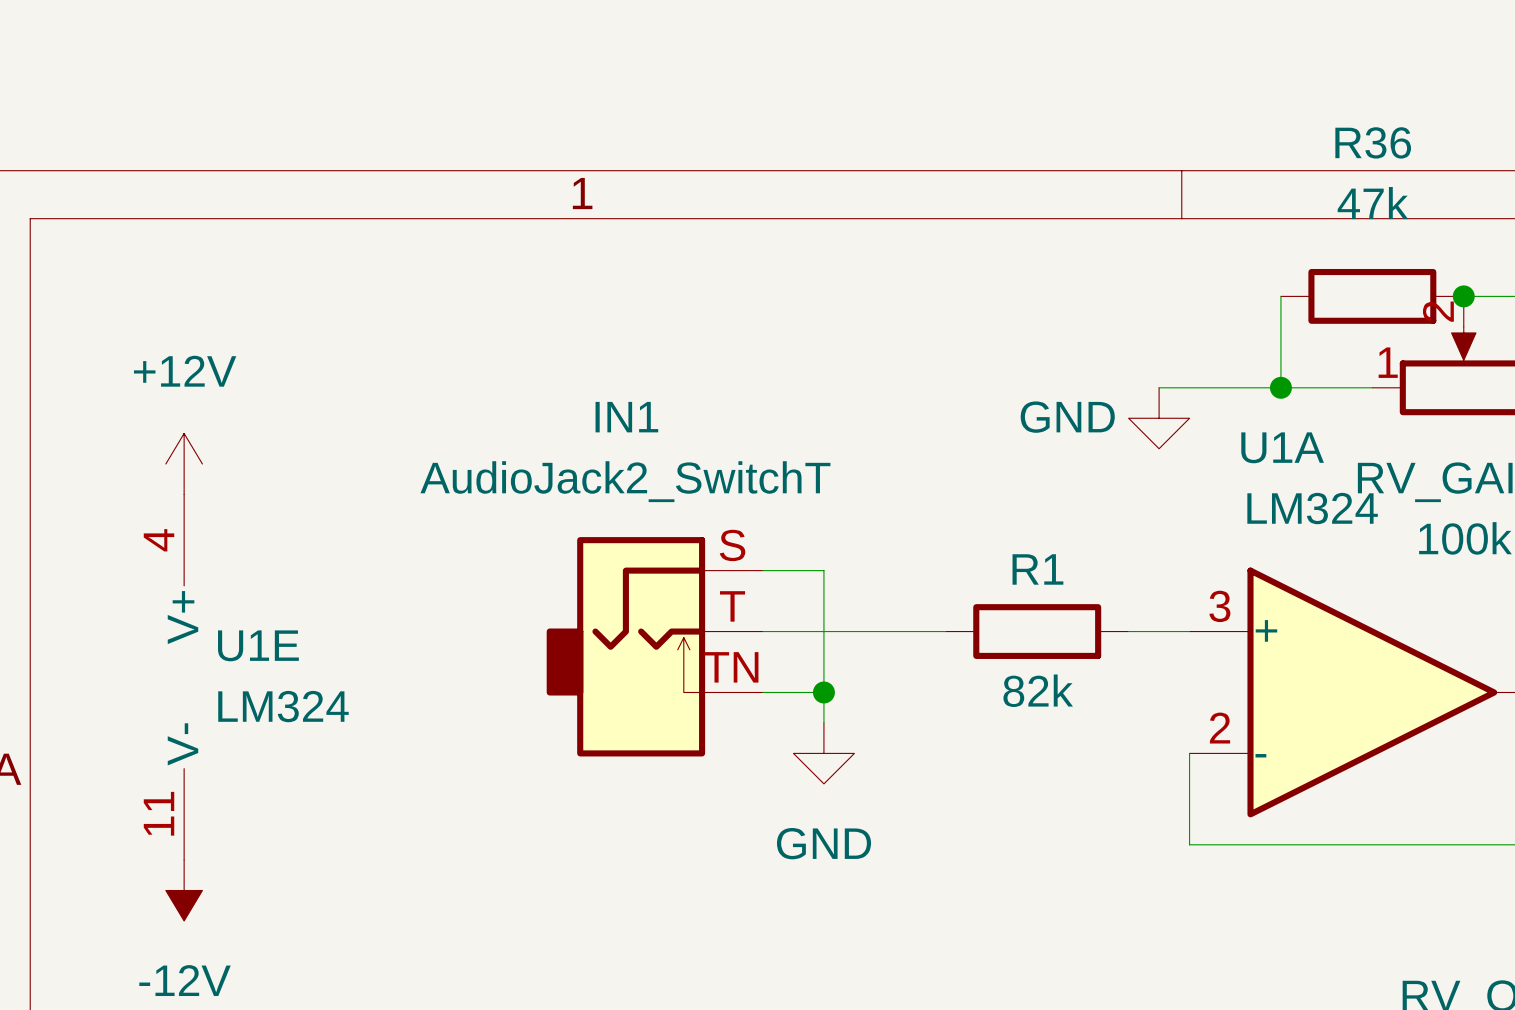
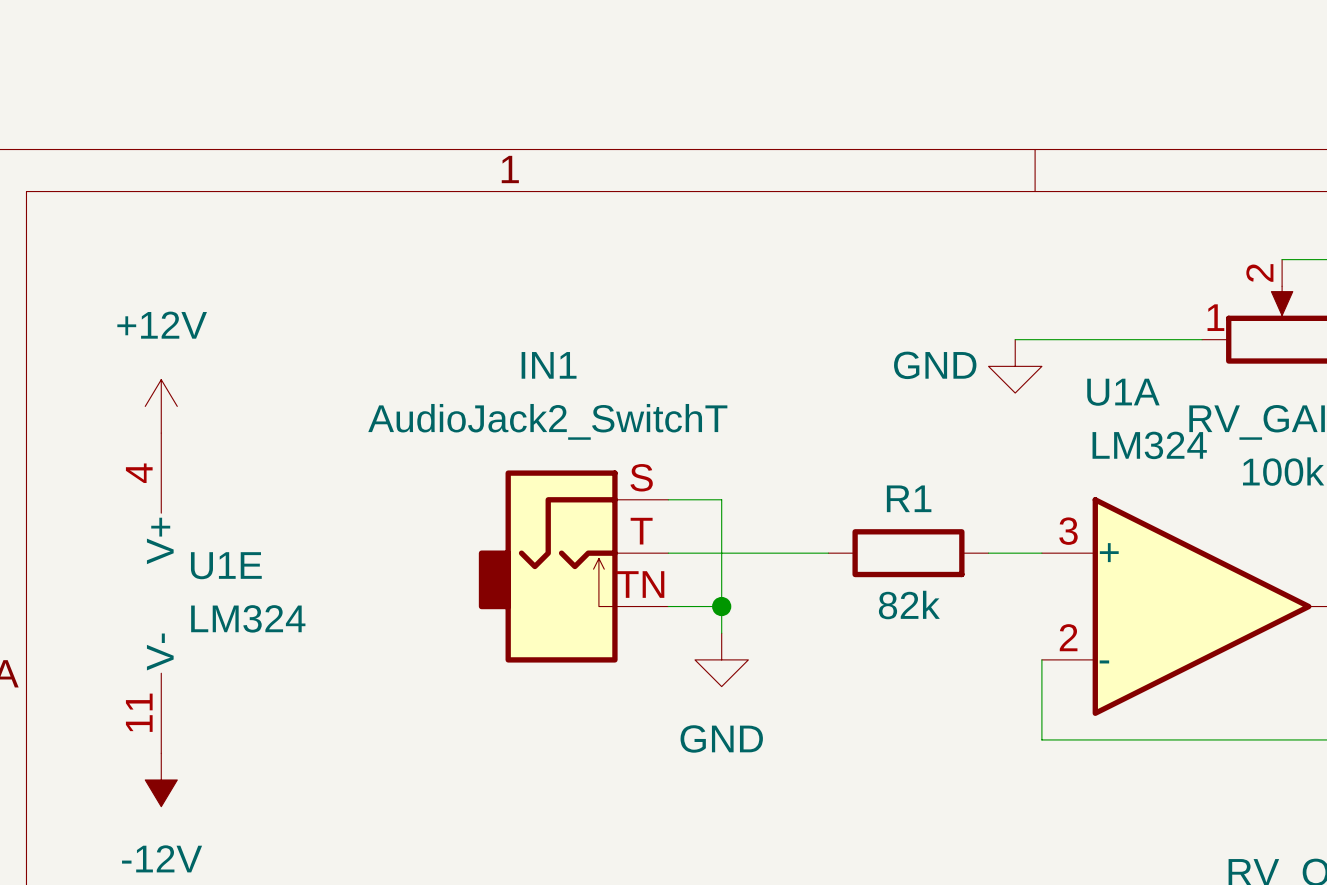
wire: (1280, 296) (1280, 387) -> none
R36: 47k (1372, 296) -> none
junction: (1463, 296) -> none
junction: (1280, 387) -> none

